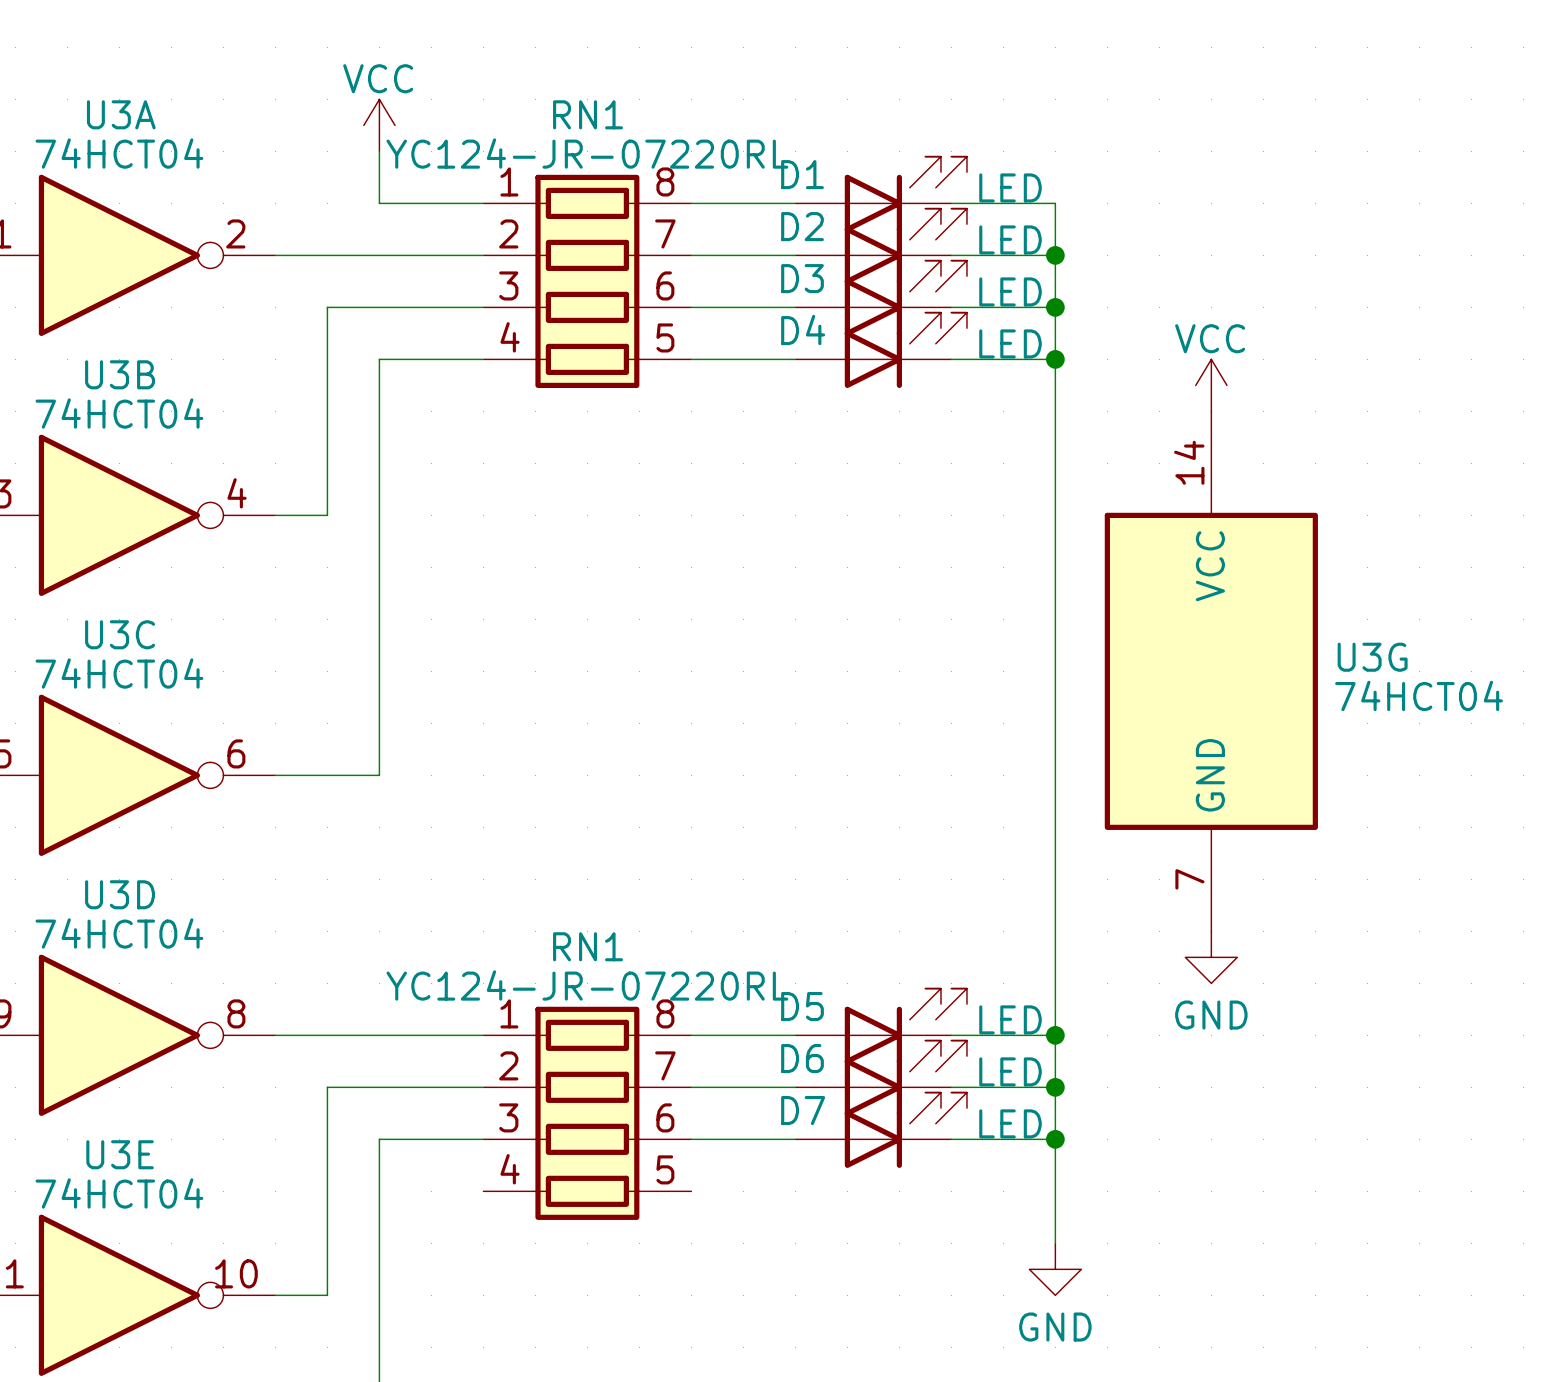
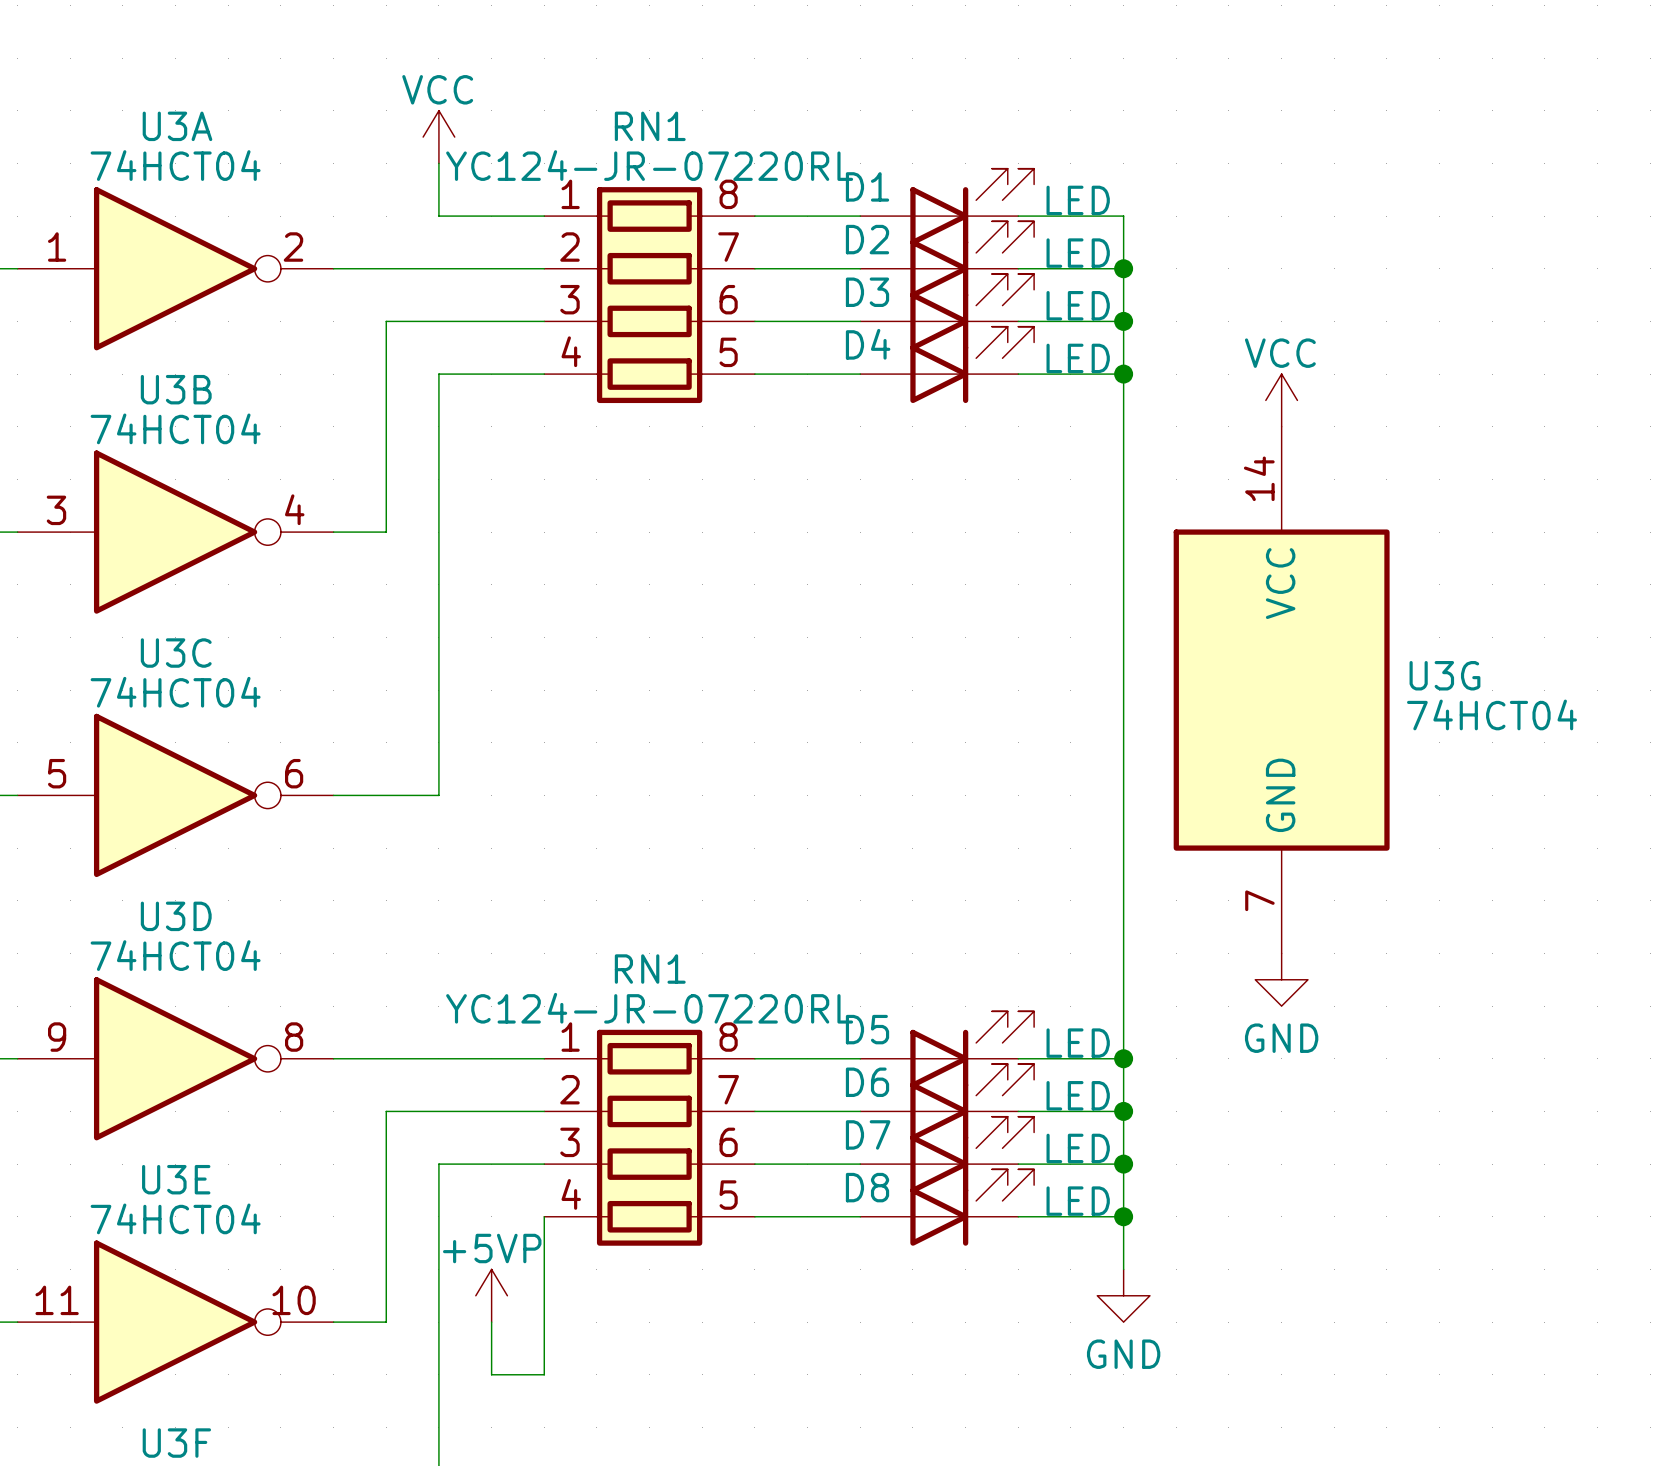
D8: none -> LED (947, 1207)
wire: none -> (544, 1216) (544, 1374) (491, 1374) (491, 1322)
wire: none -> (754, 1216) (860, 1216)
wire: none -> (1018, 1216) (1123, 1216)
junction: none -> (1123, 1216)
power symbol: none -> +5VP (491, 1295)

